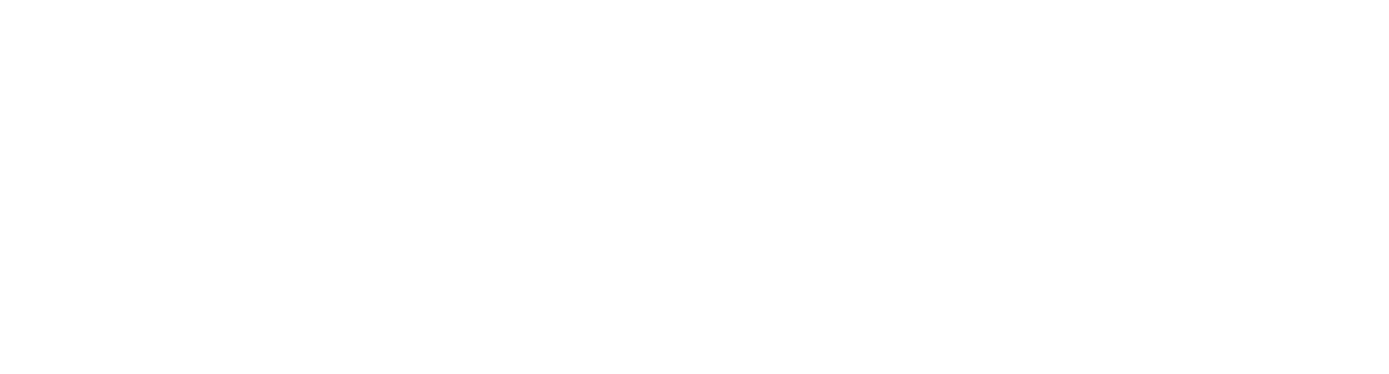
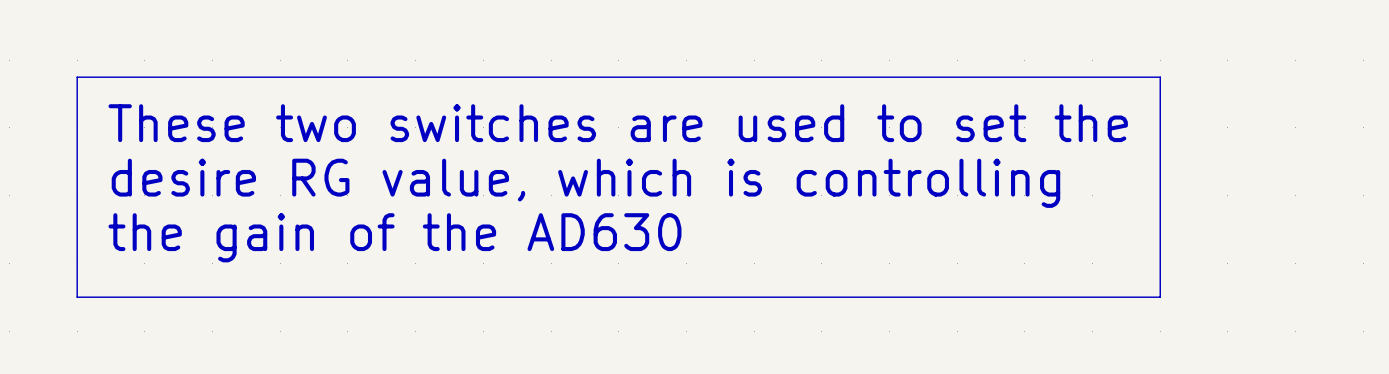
line: none -> (77, 77) (1160, 77) (1160, 297) (77, 297) (77, 77)
text: none -> These two switches are used to set the (618, 123)
text: none -> desire RG value, which is controlling (585, 183)
text: none -> the gain of the AD630 (394, 237)

